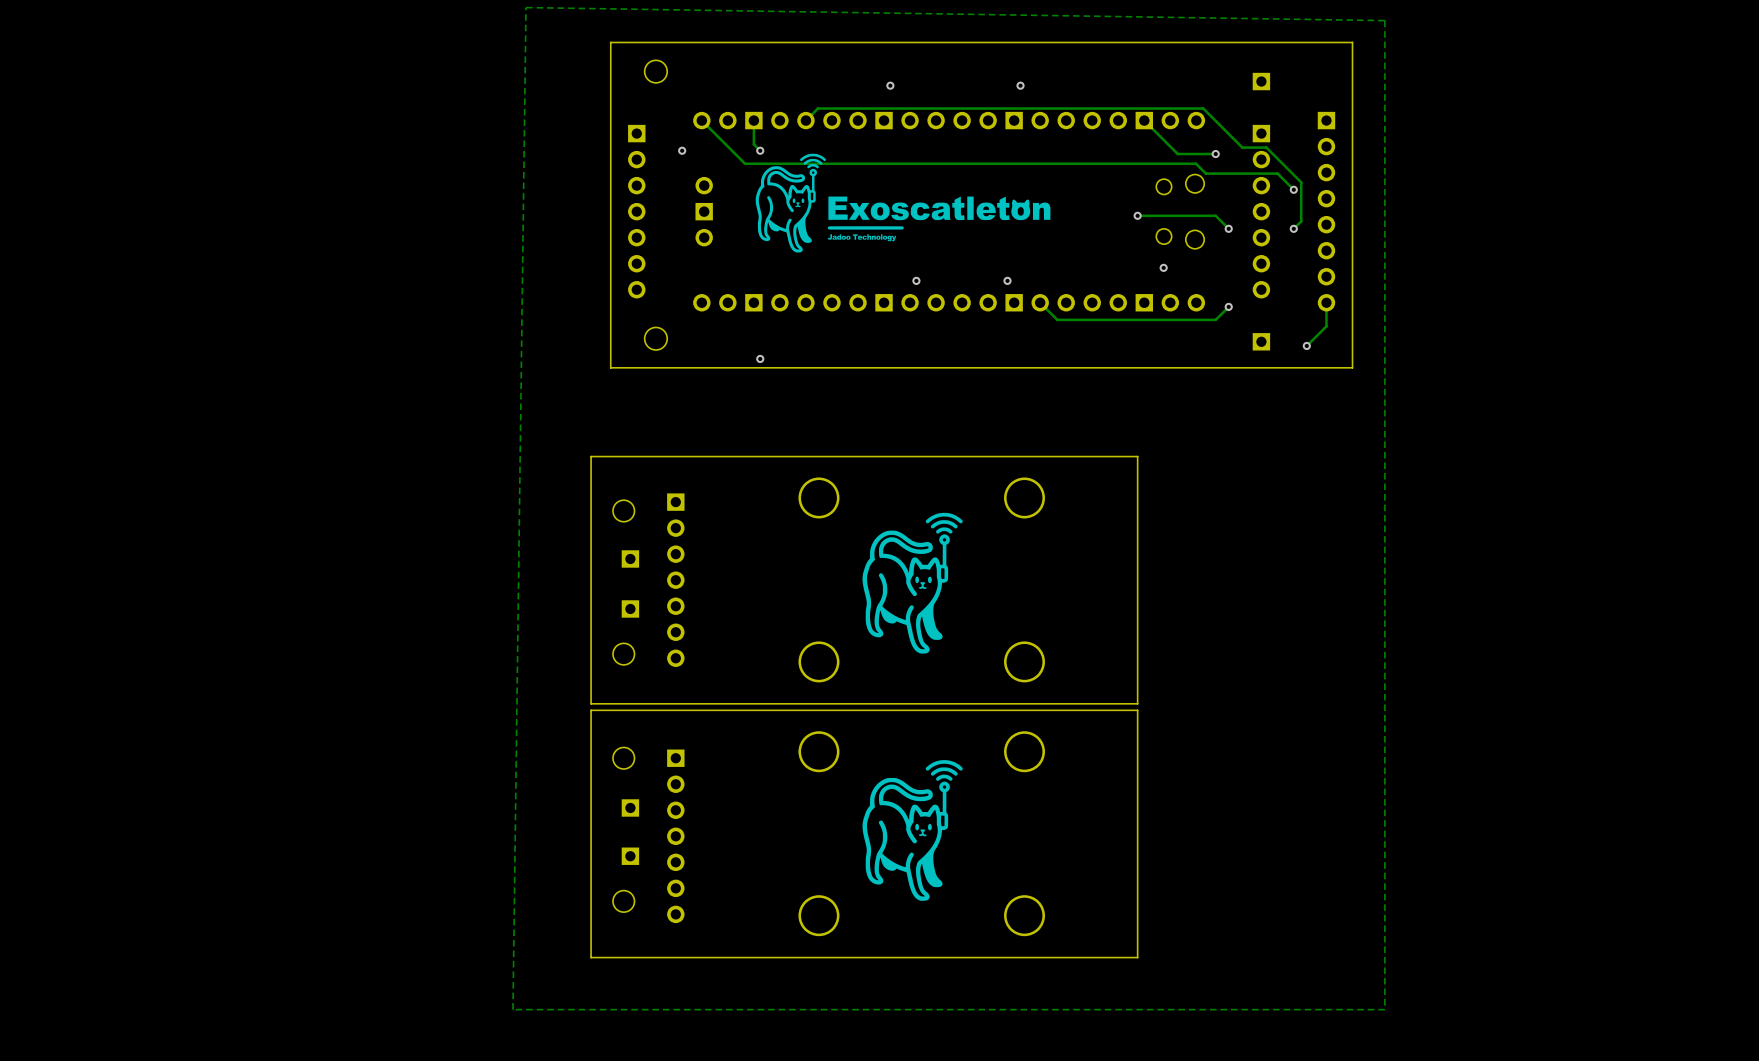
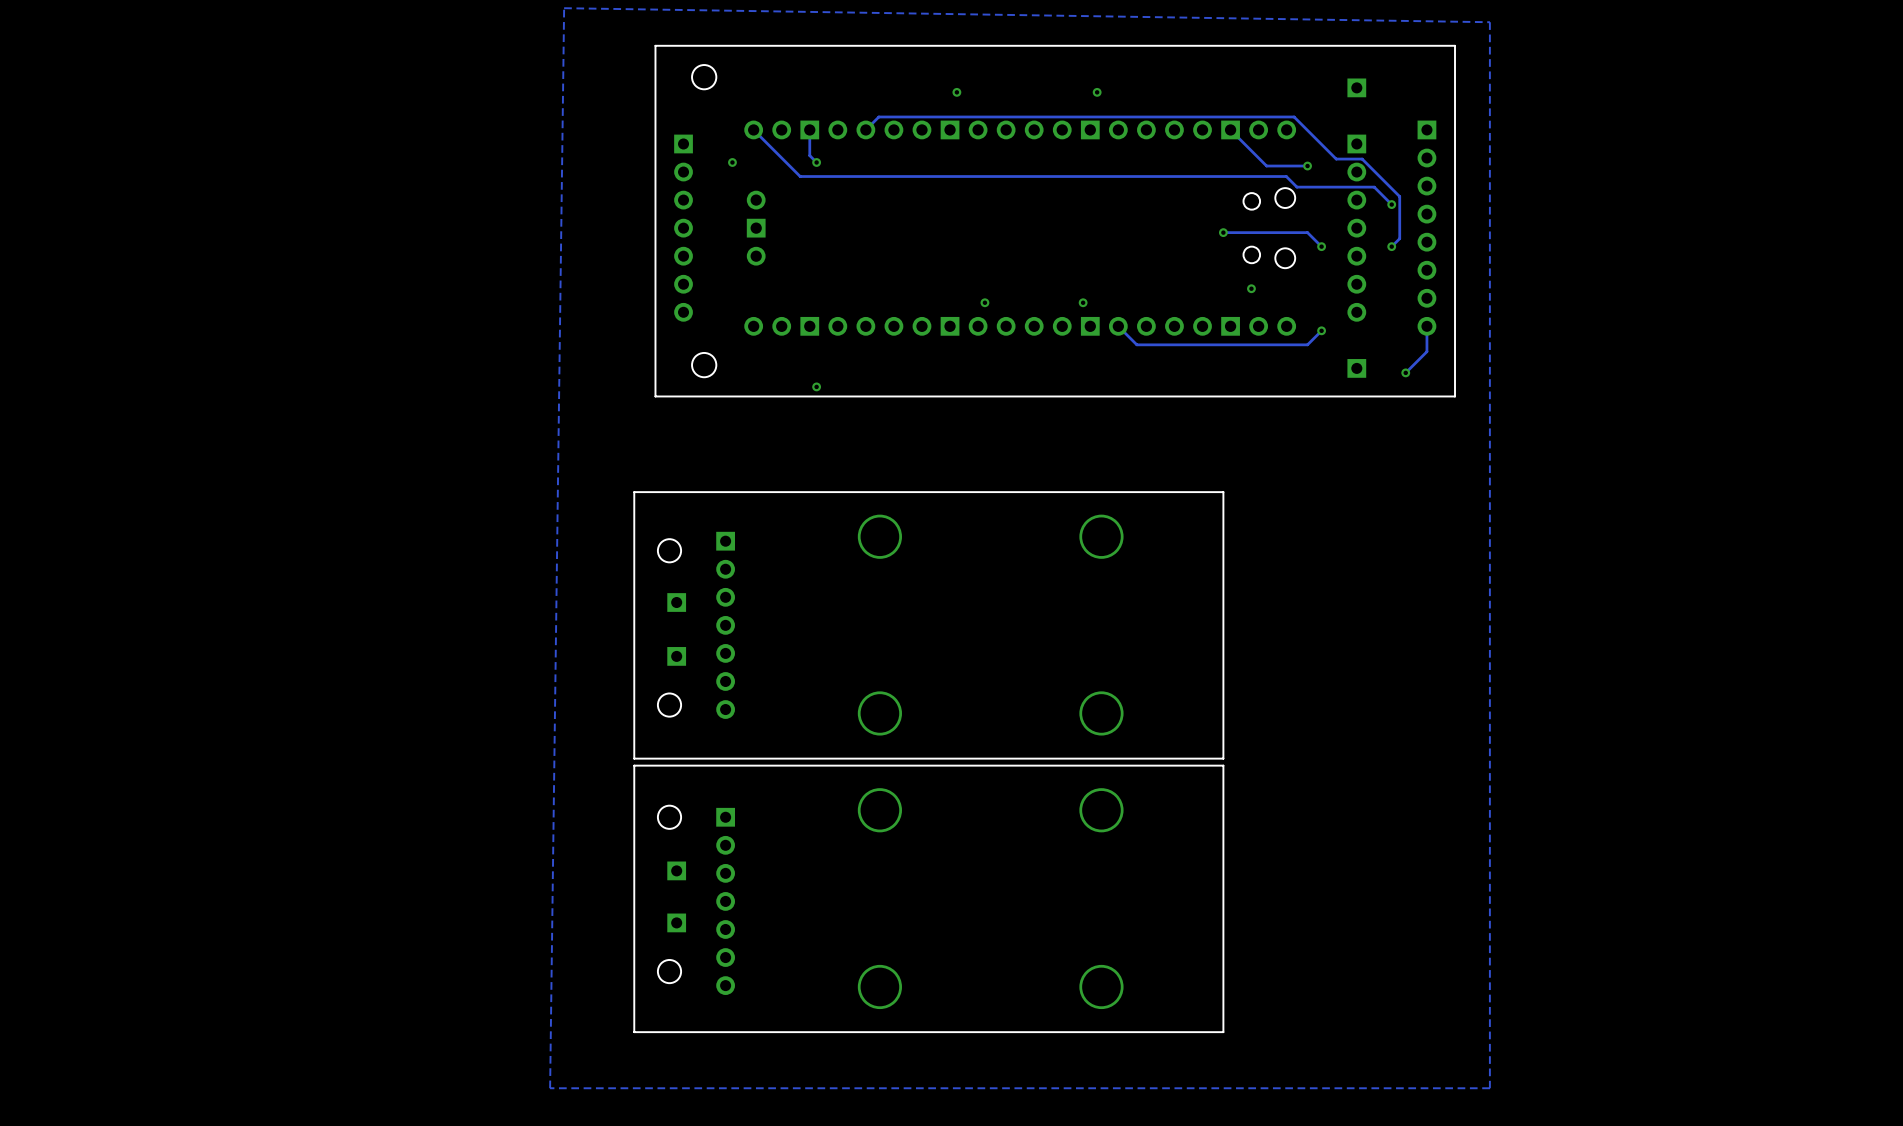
drawing: [755, 153, 1051, 253] -> none
drawing: [862, 512, 963, 654] -> none
drawing: [862, 760, 963, 901] -> none

